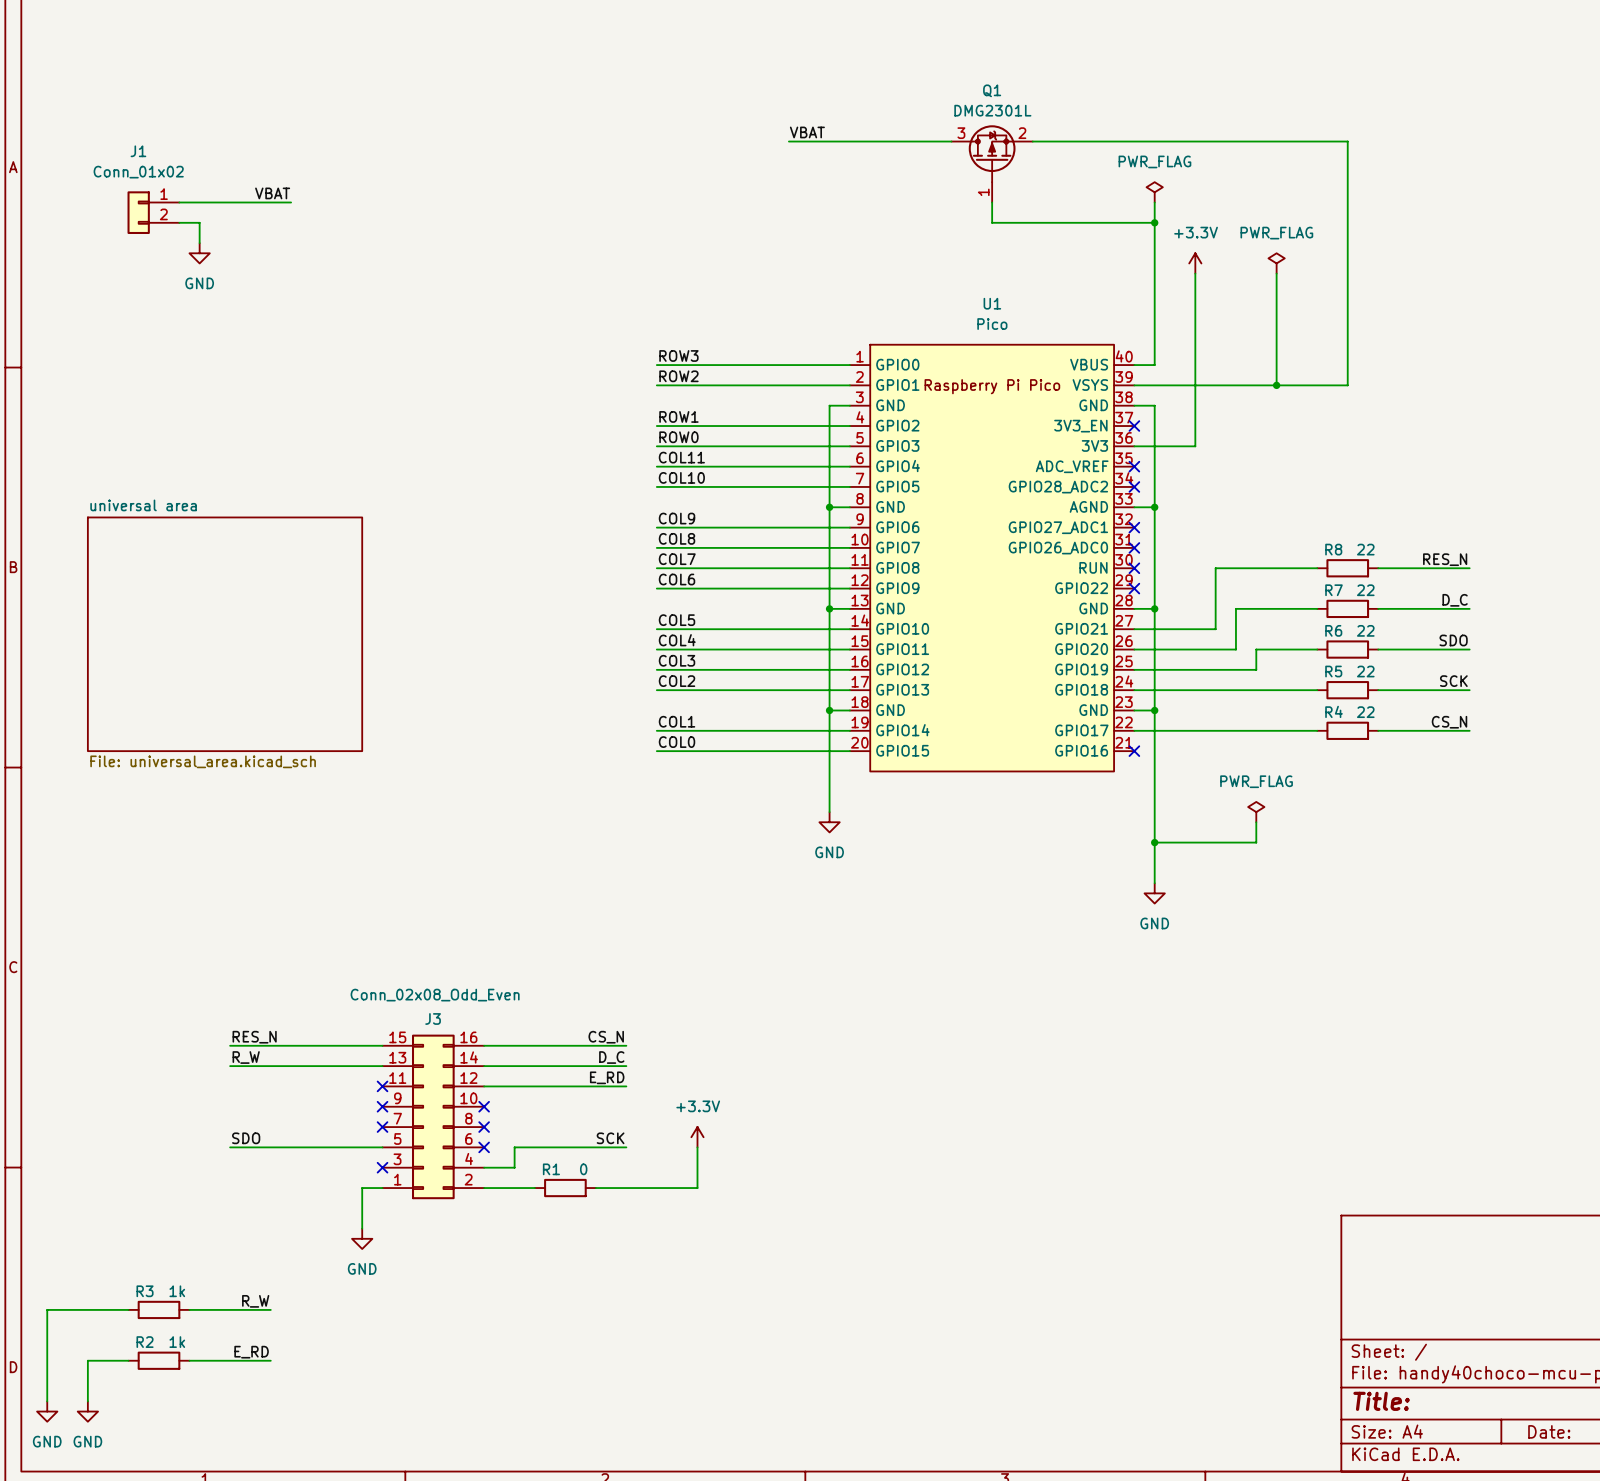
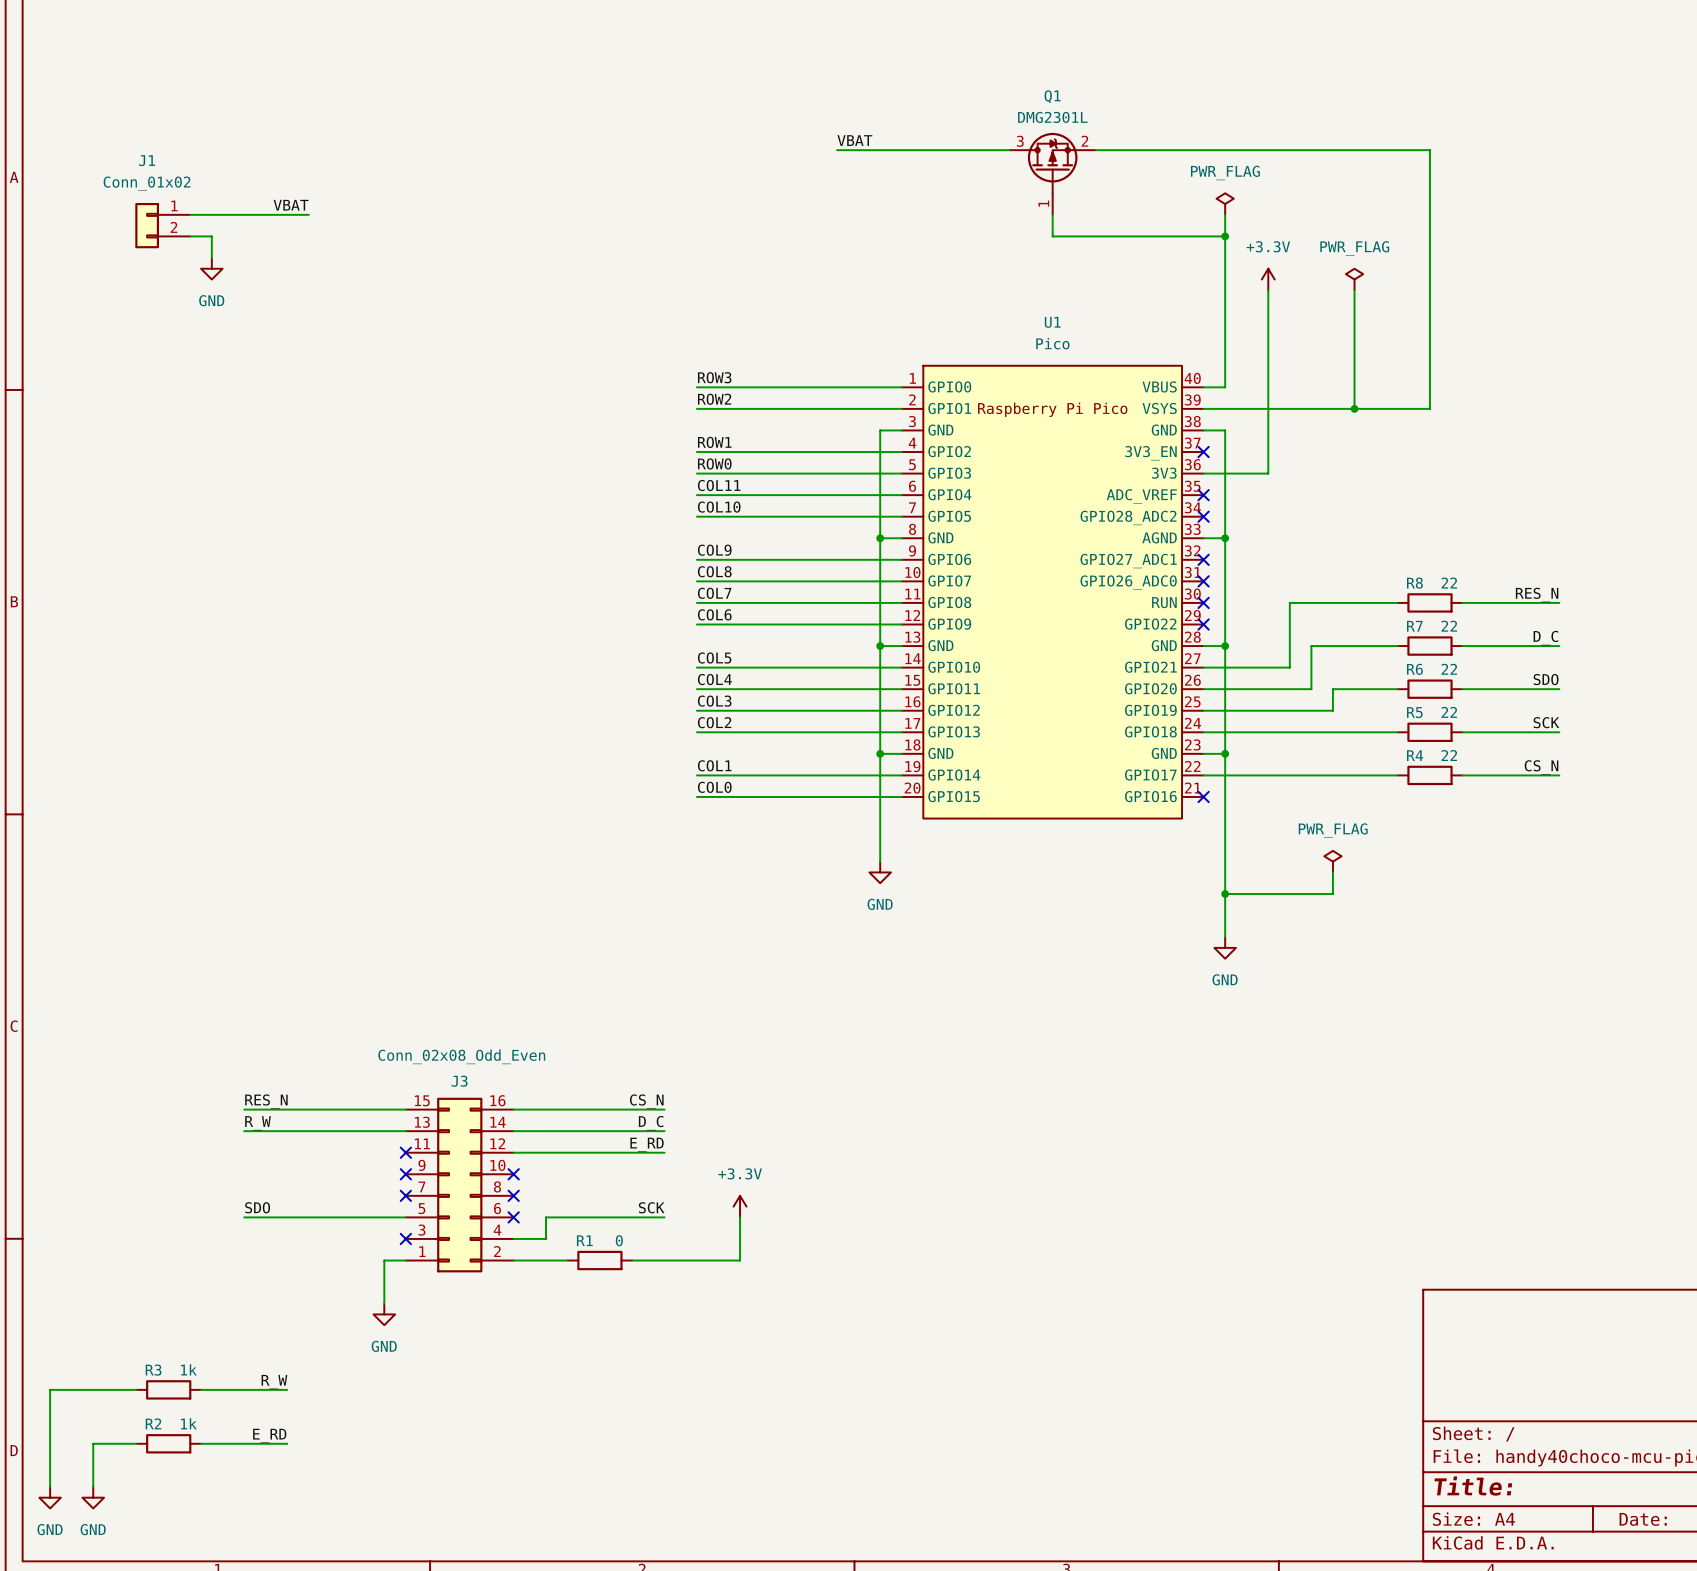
sheet universal area: File: universal_area.kicad_sch (225, 634) -> none

